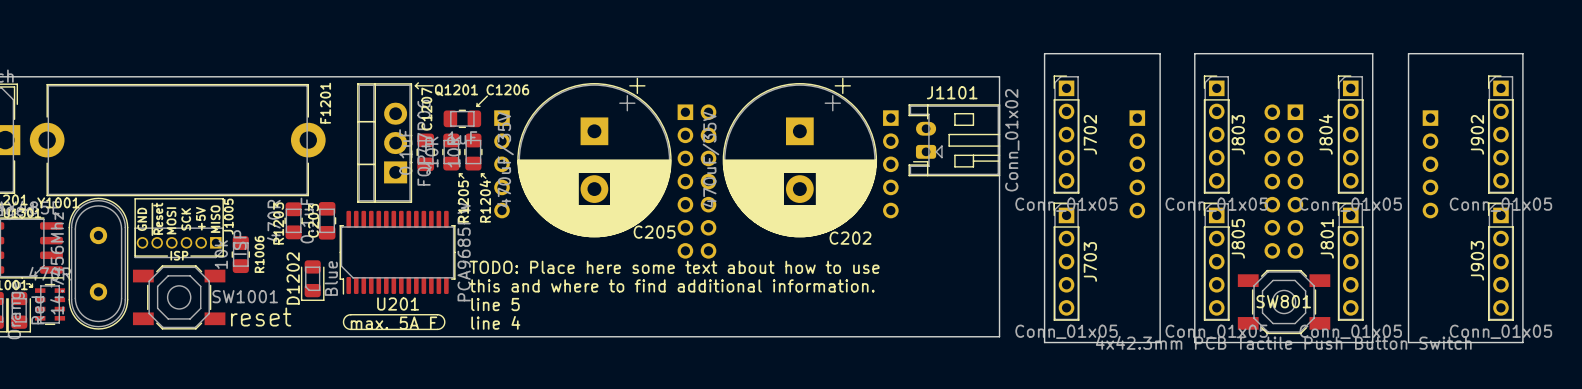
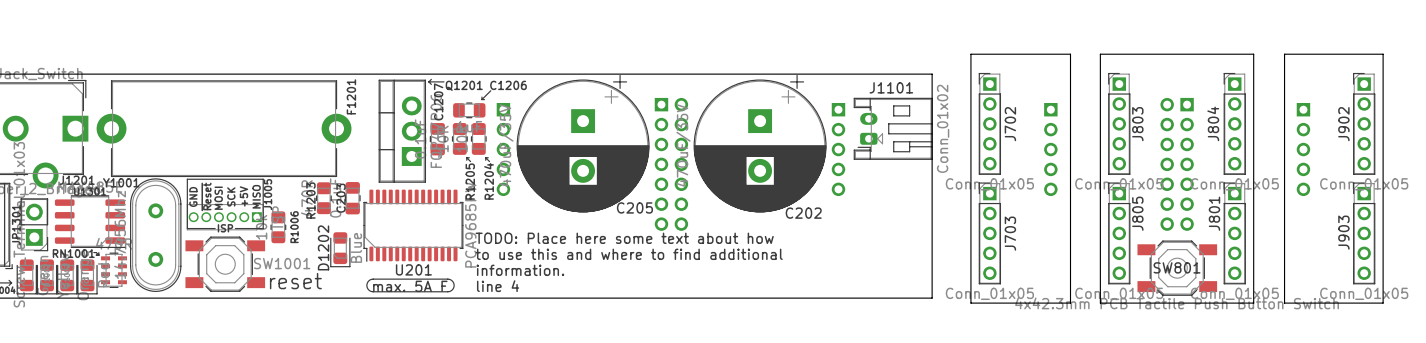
text: TODO: Place here some text about how to use (674, 267) -> TODO: Place here some text about how (624, 238)
text: this and where to find additional information. (672, 285) -> to use this and where to find additional (629, 254)
text: line 5 (495, 304) -> information. (520, 270)

